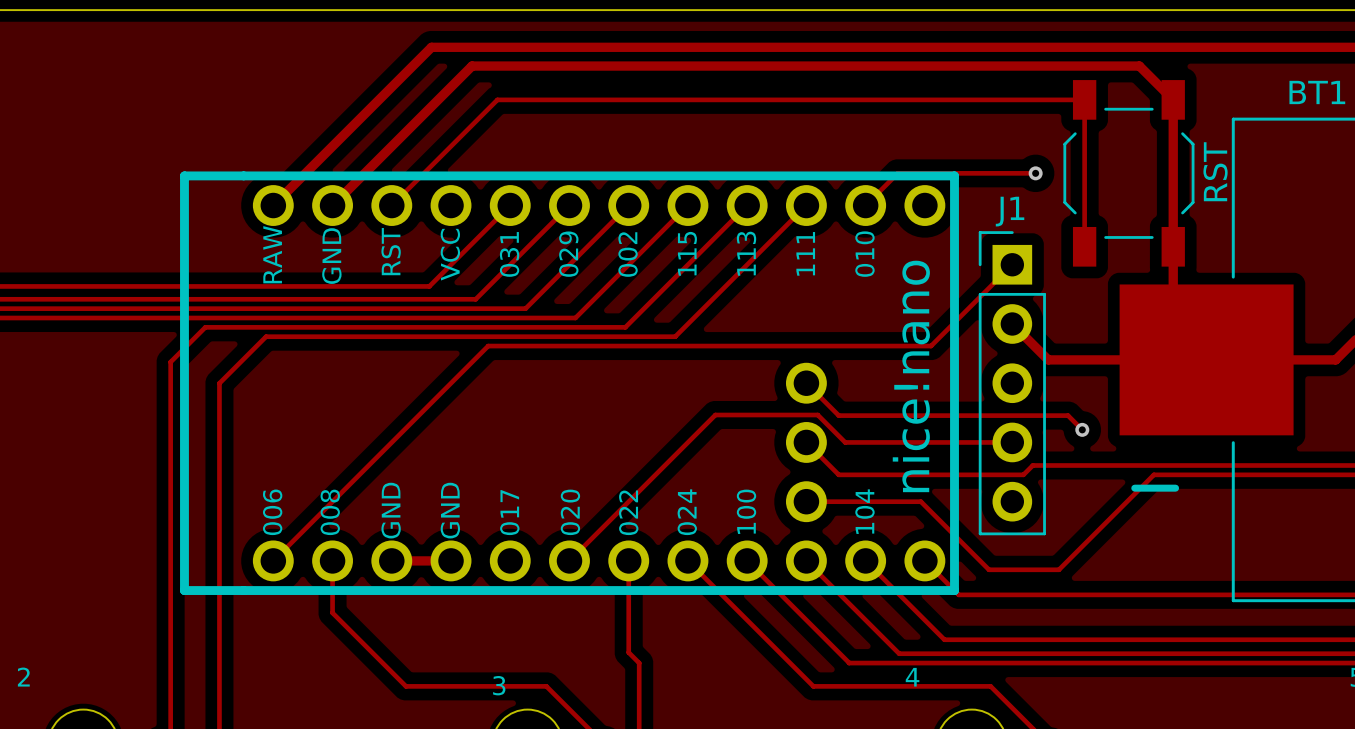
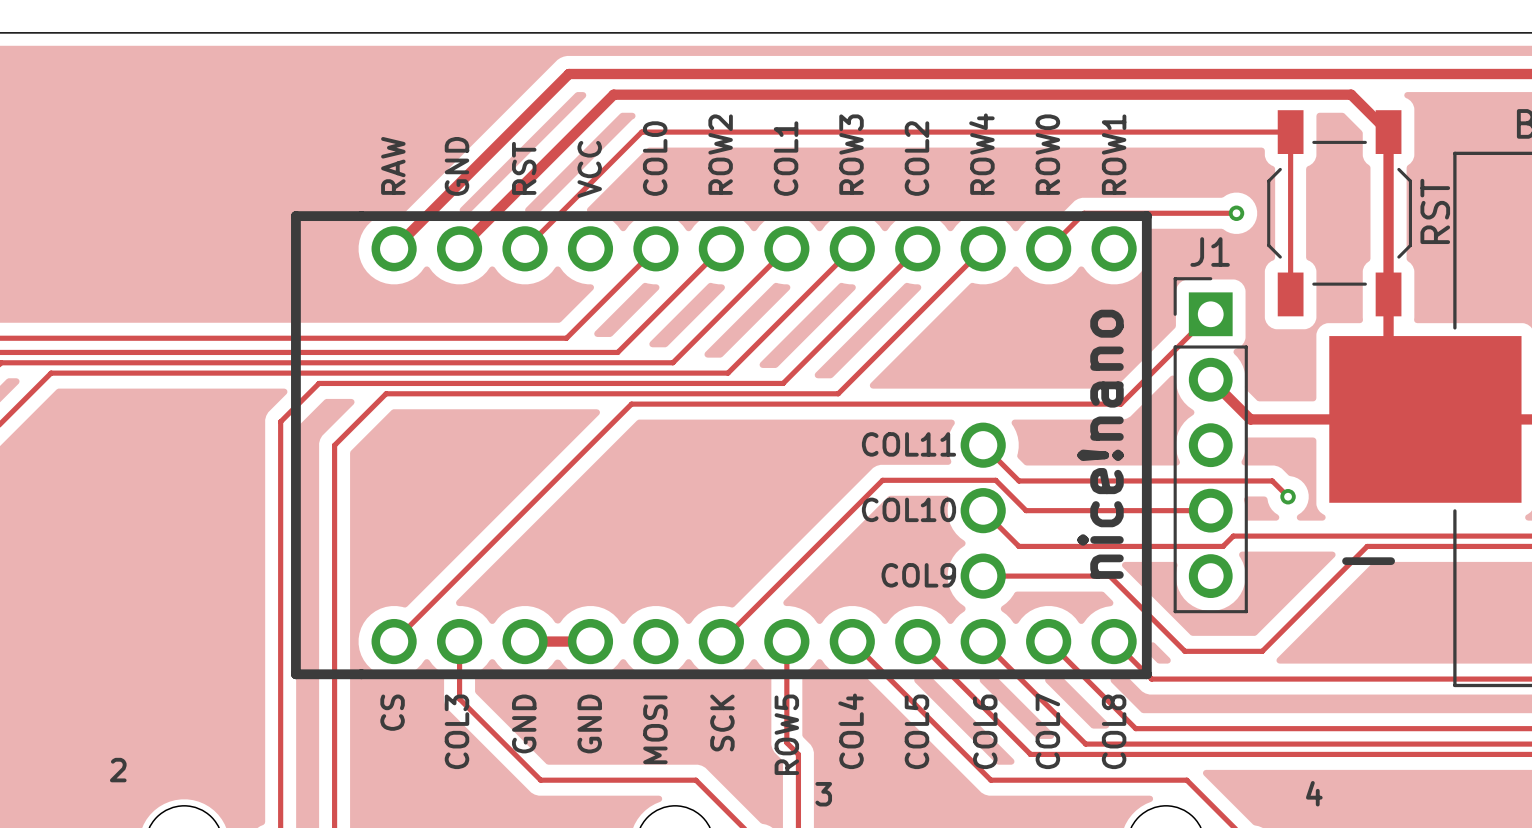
part footprint: [180, 171, 959, 595] -> [291, 211, 1152, 680]
part value position: 4 (912, 677) -> 4 (1314, 793)
part value position: 3 (499, 685) -> 3 (823, 794)

